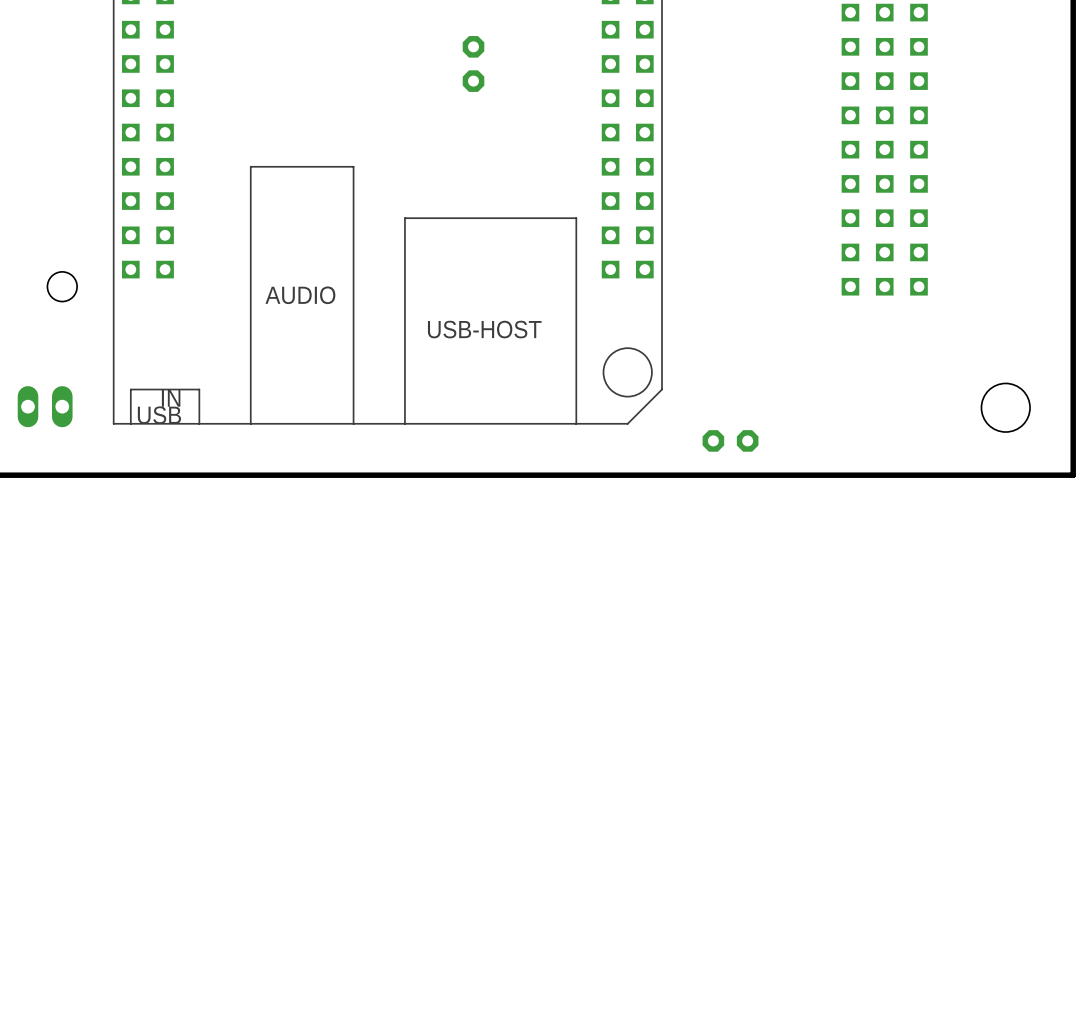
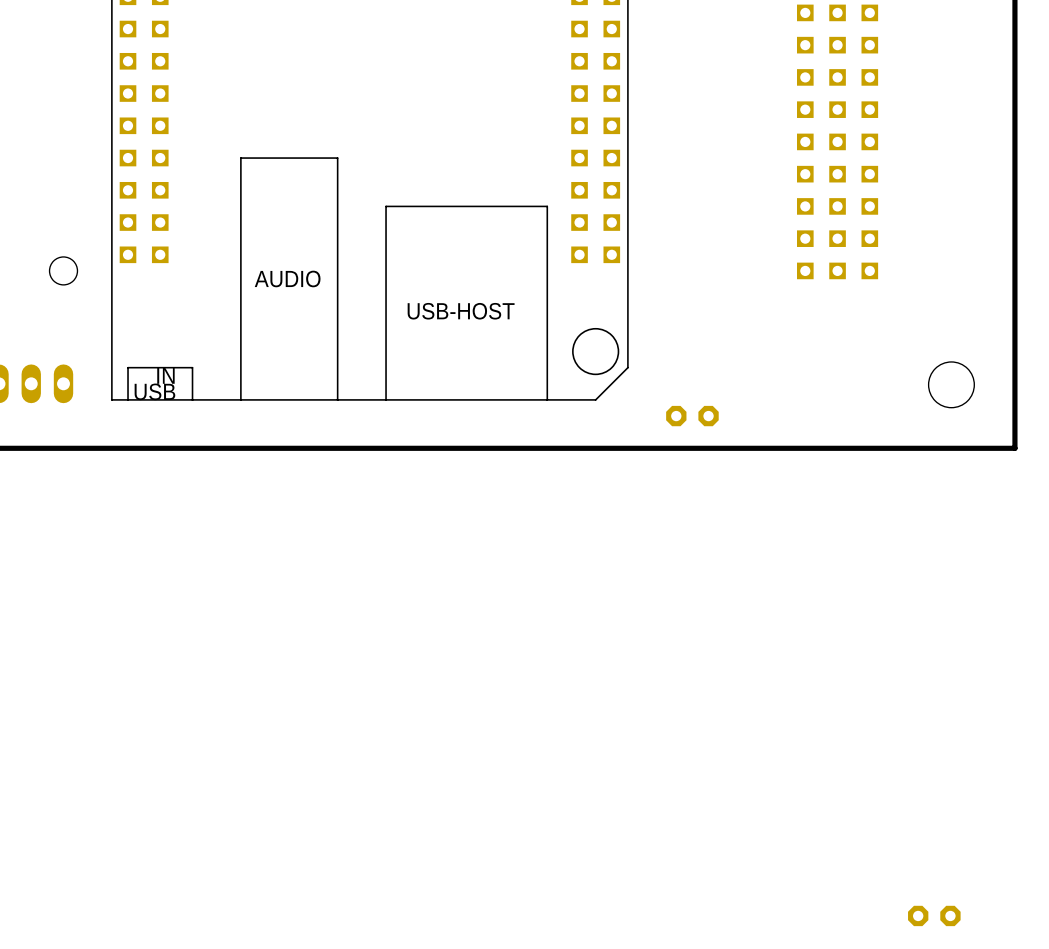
part: (473, 63) -> none
part: none -> (934, 915)

